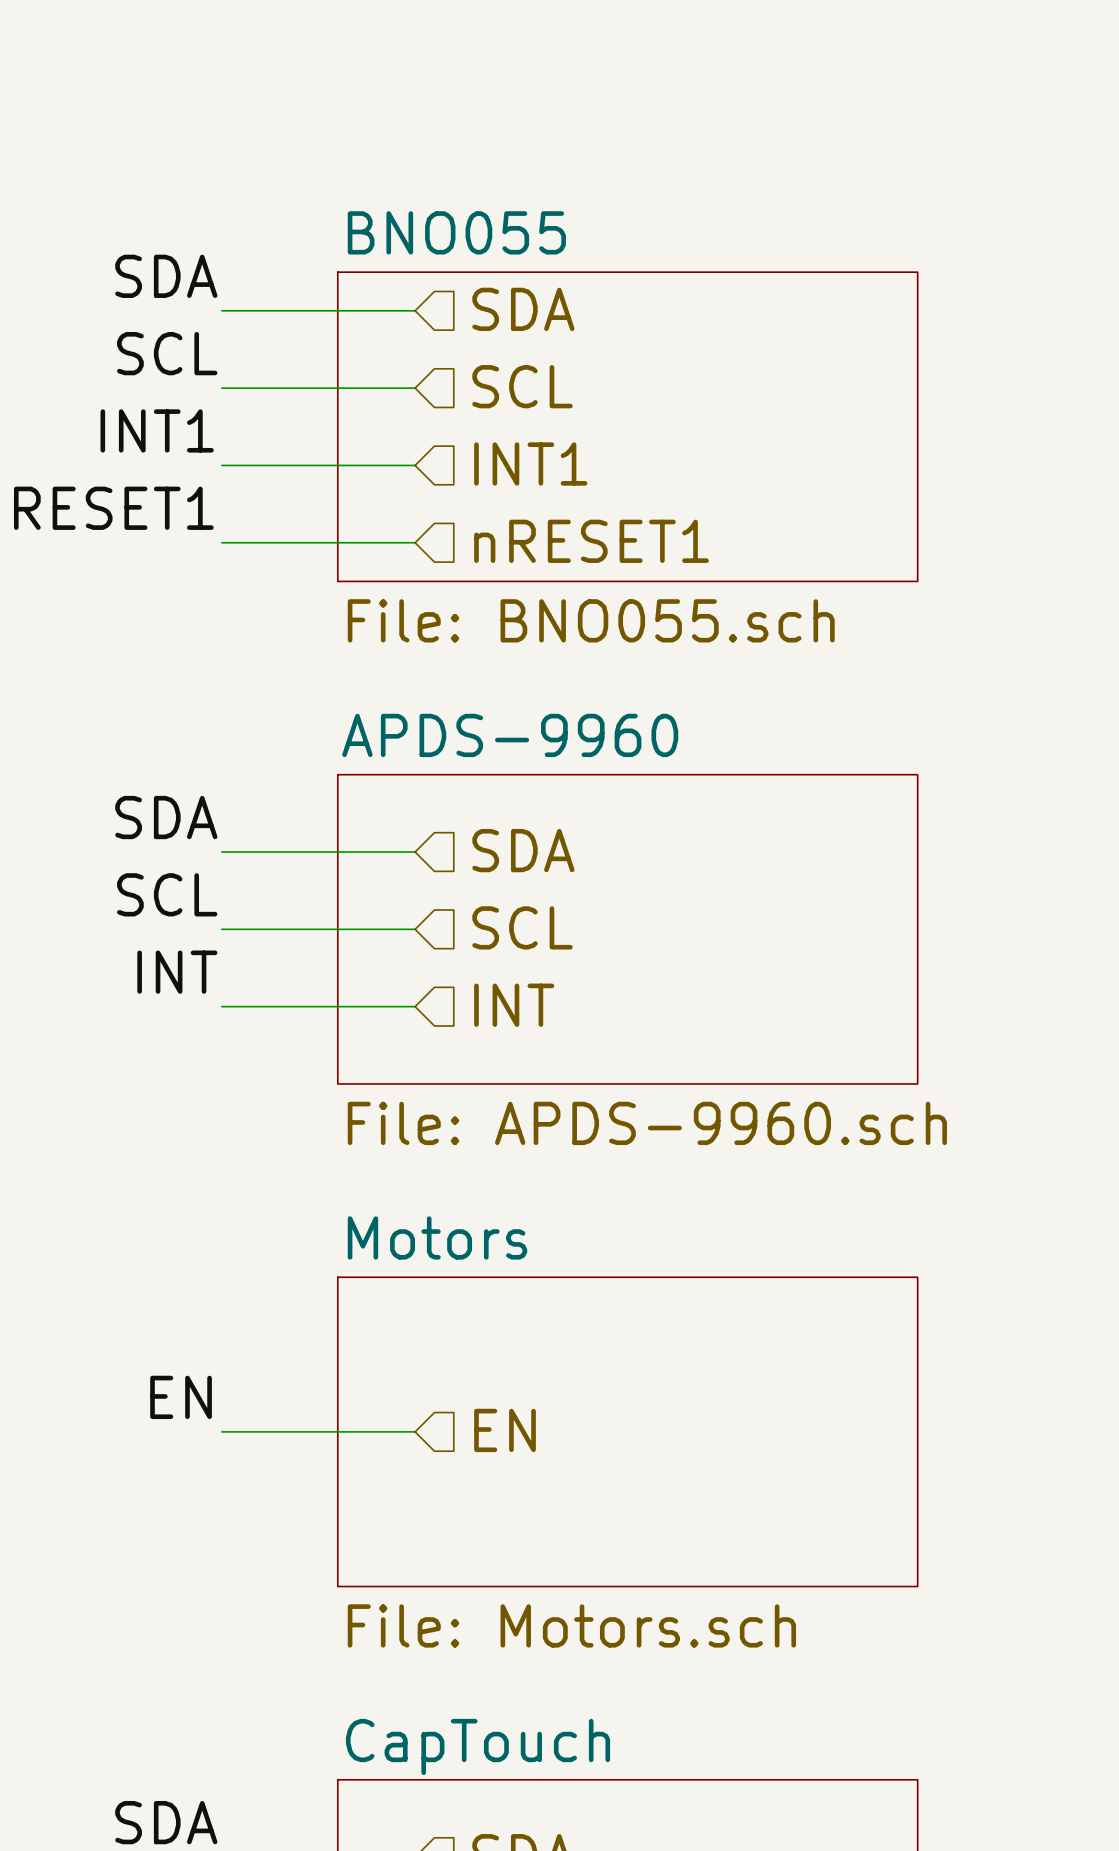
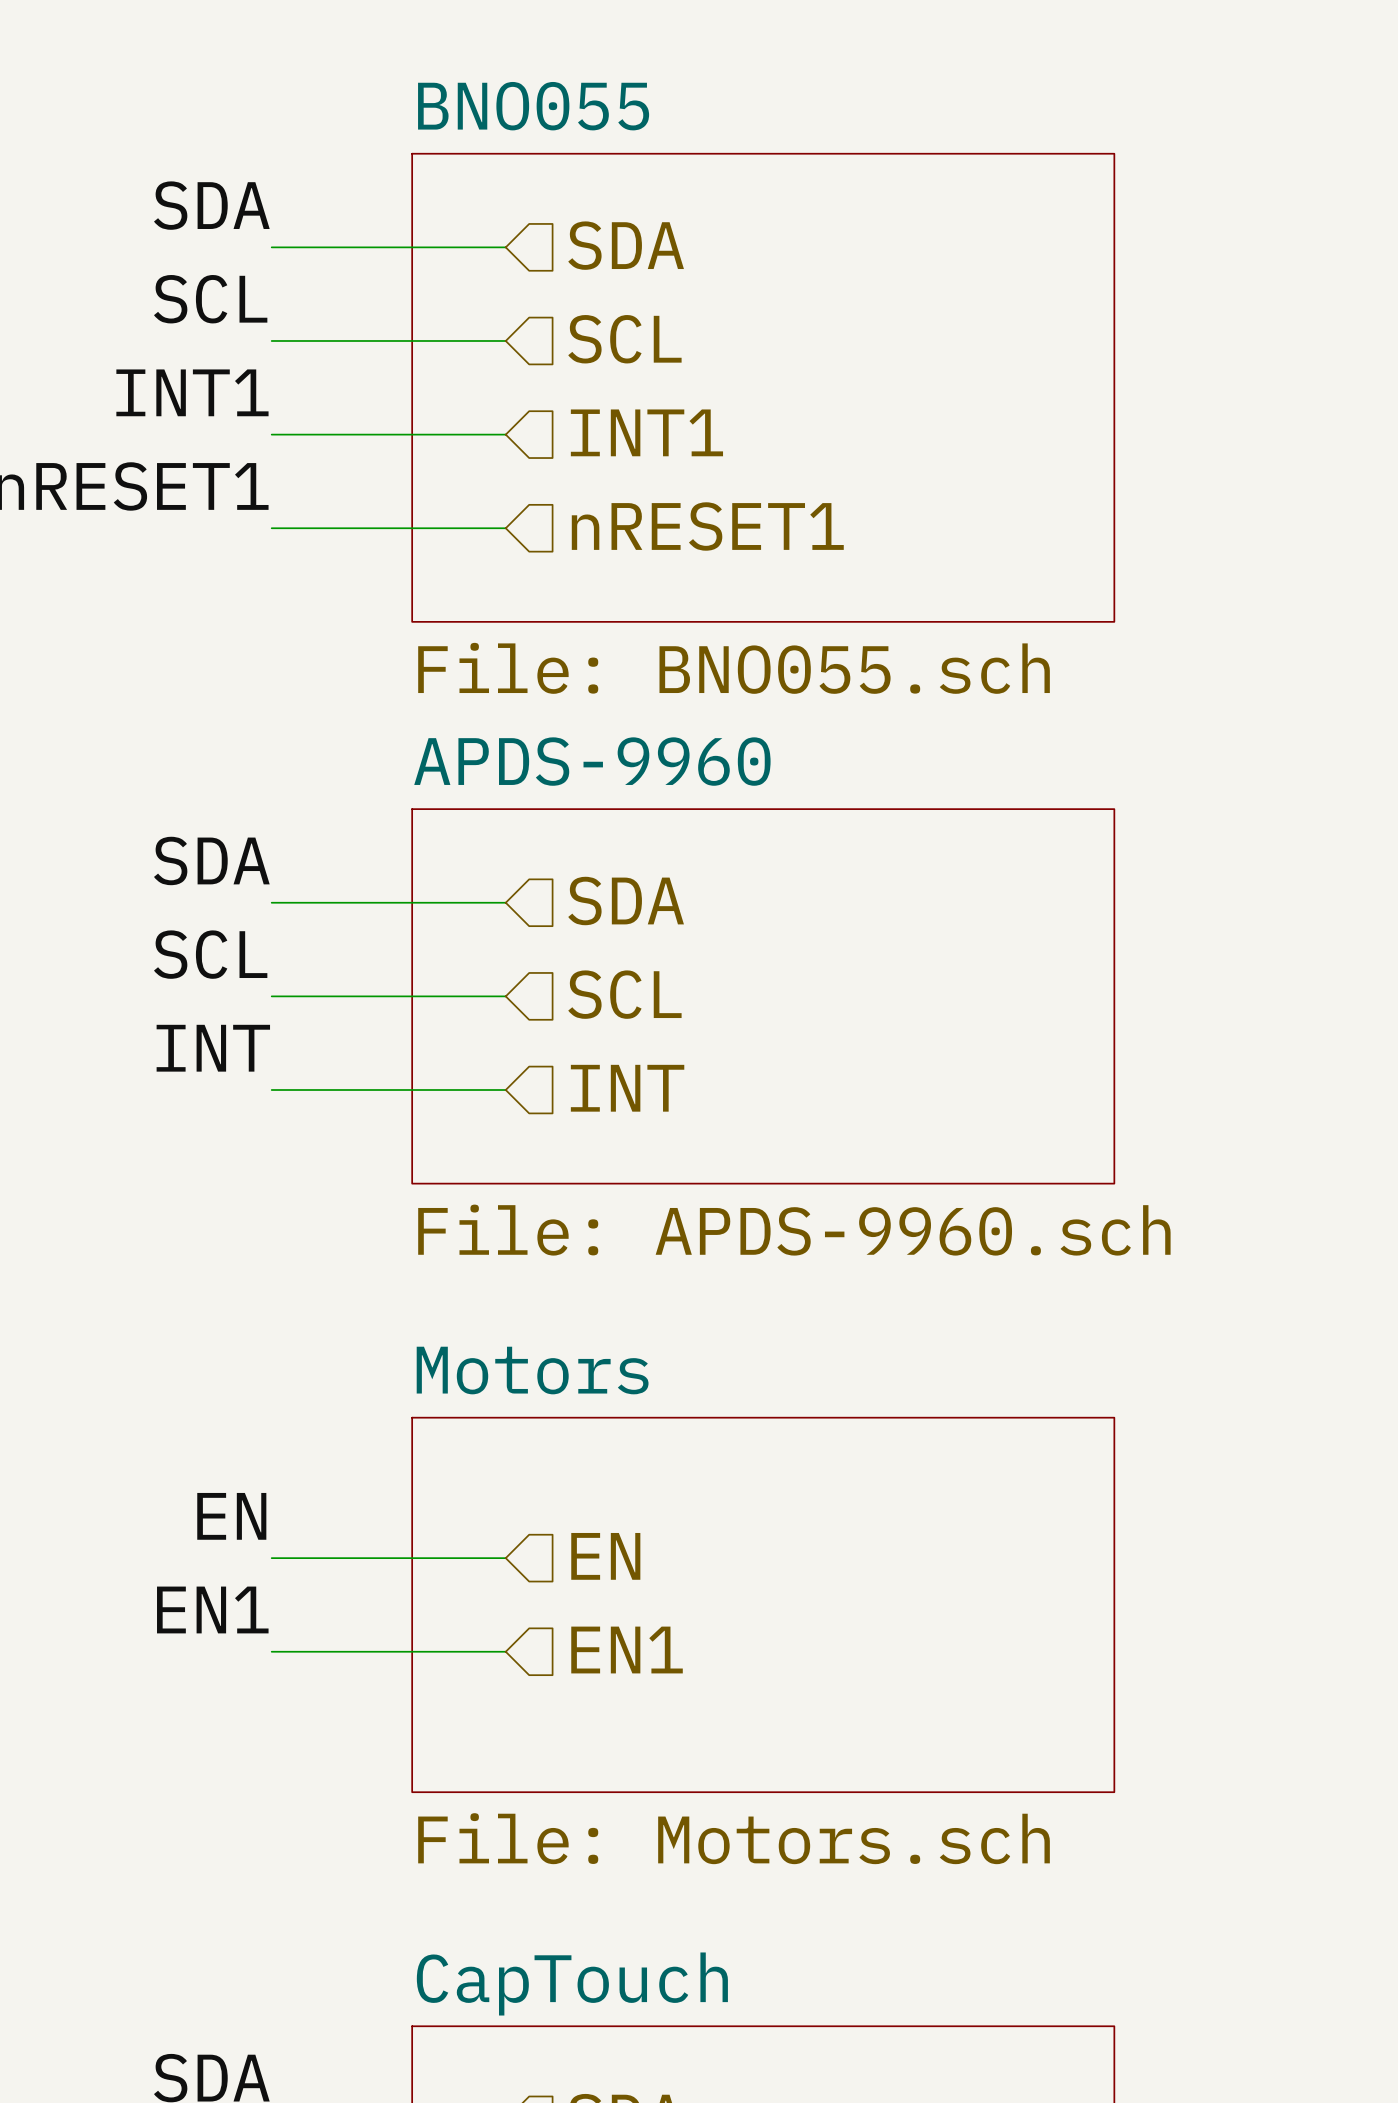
sheet BNO055 shape: [337, 272, 918, 582] -> [412, 153, 1115, 622]
label position: EN (181, 1397) -> EN (231, 1516)
hierarchical label position: EN (505, 1430) -> EN (605, 1556)
wire: (221, 1431) (415, 1431) -> (271, 1558) (505, 1558)
label: none -> EN1 (212, 1609)
hierarchical label: none -> EN1 (627, 1650)
wire: none -> (271, 1651) (505, 1651)

